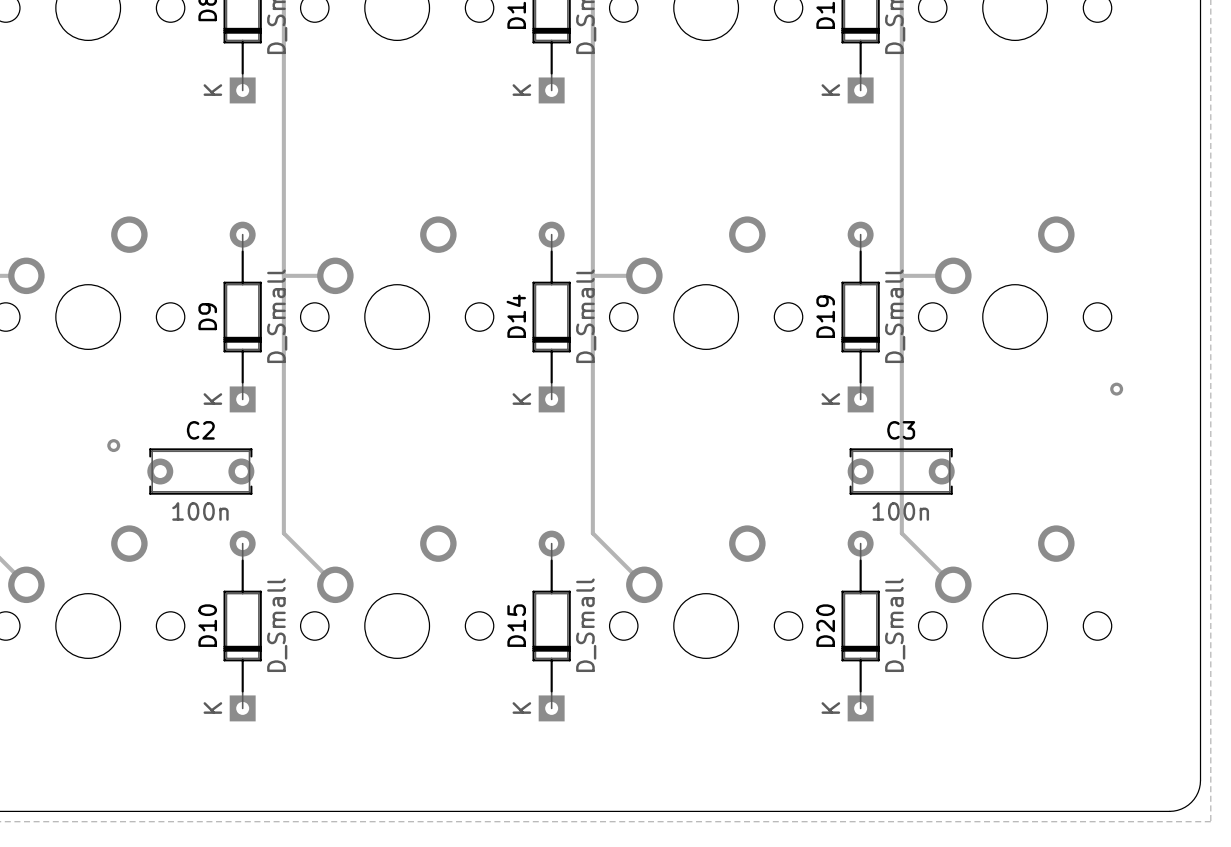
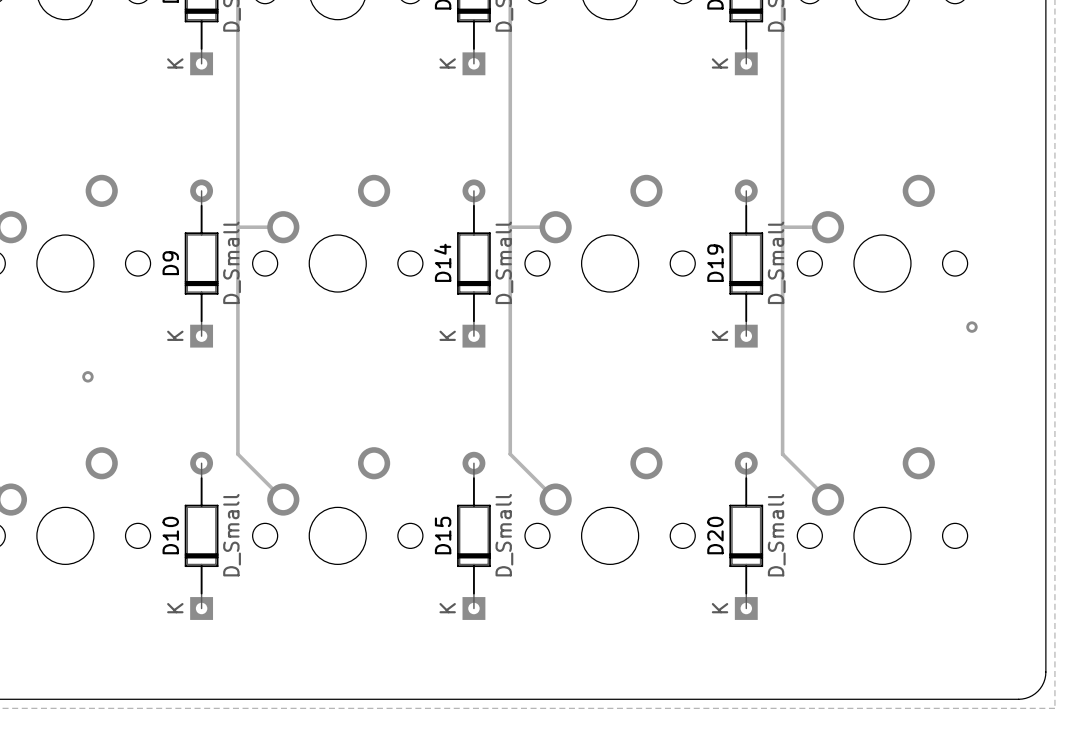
C2: 100n (200, 471) -> none
C3: 100n (901, 471) -> none

